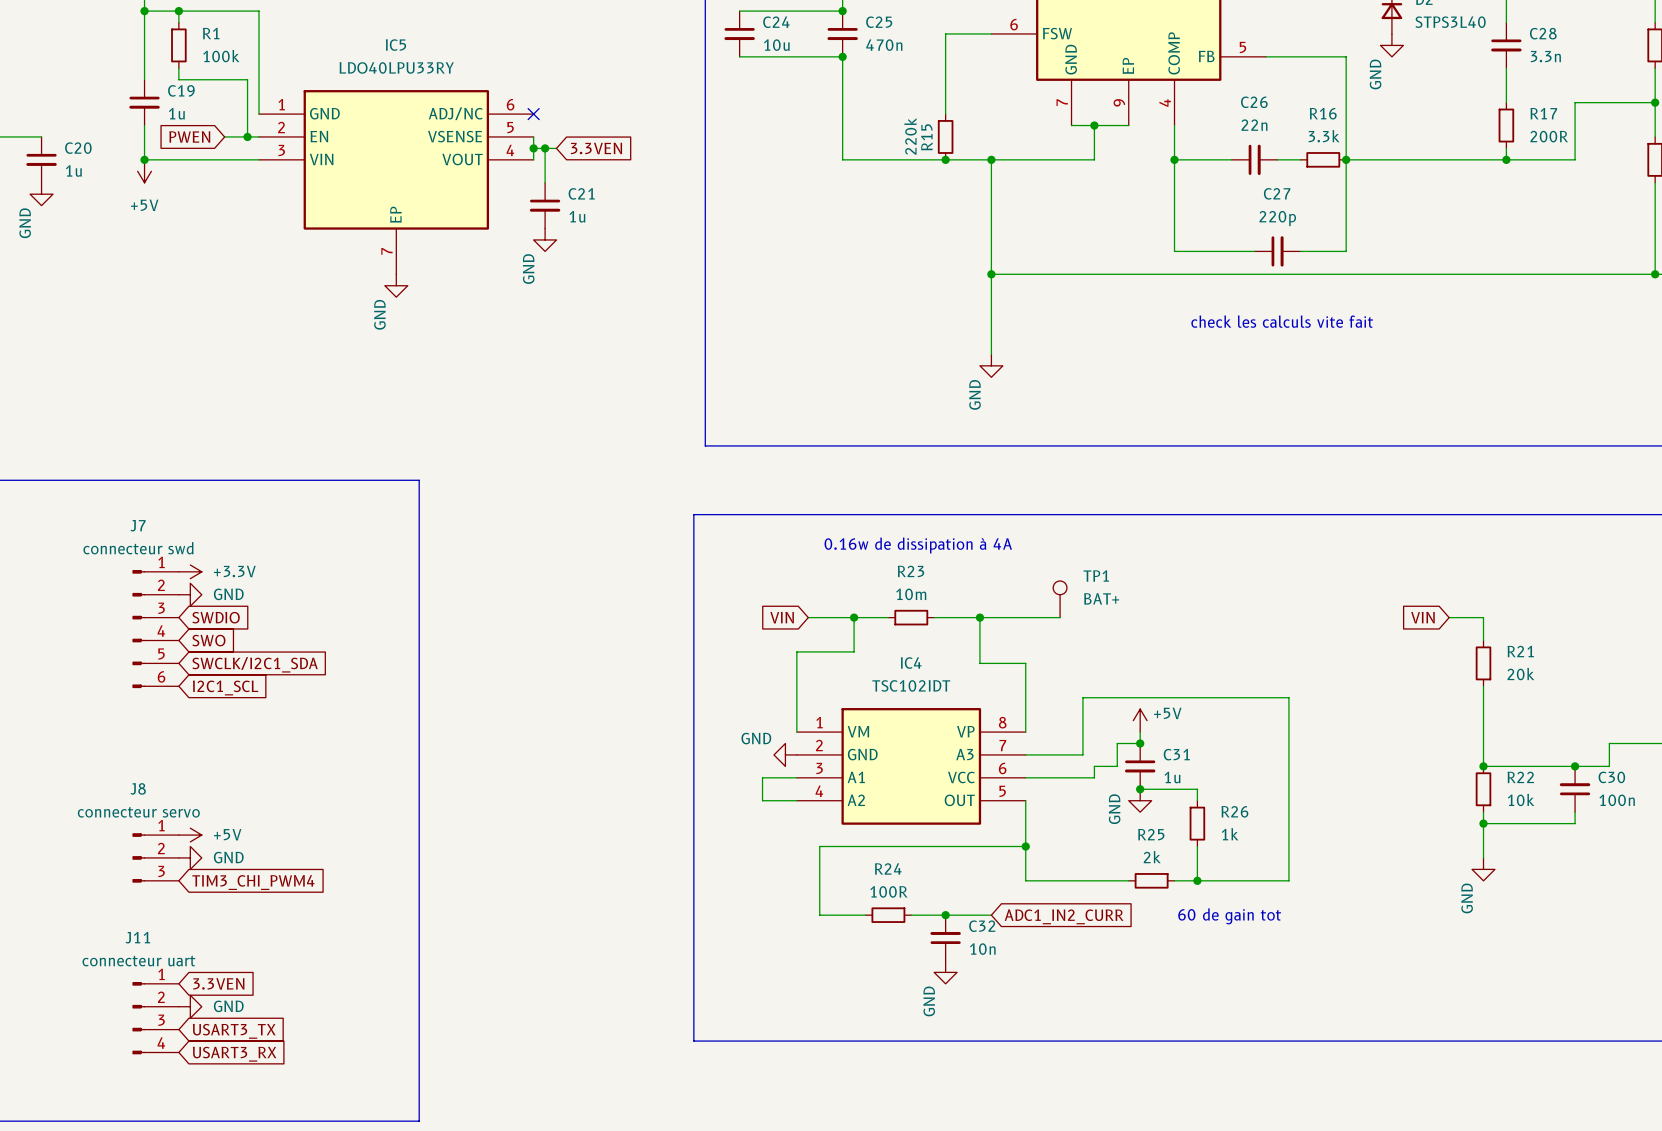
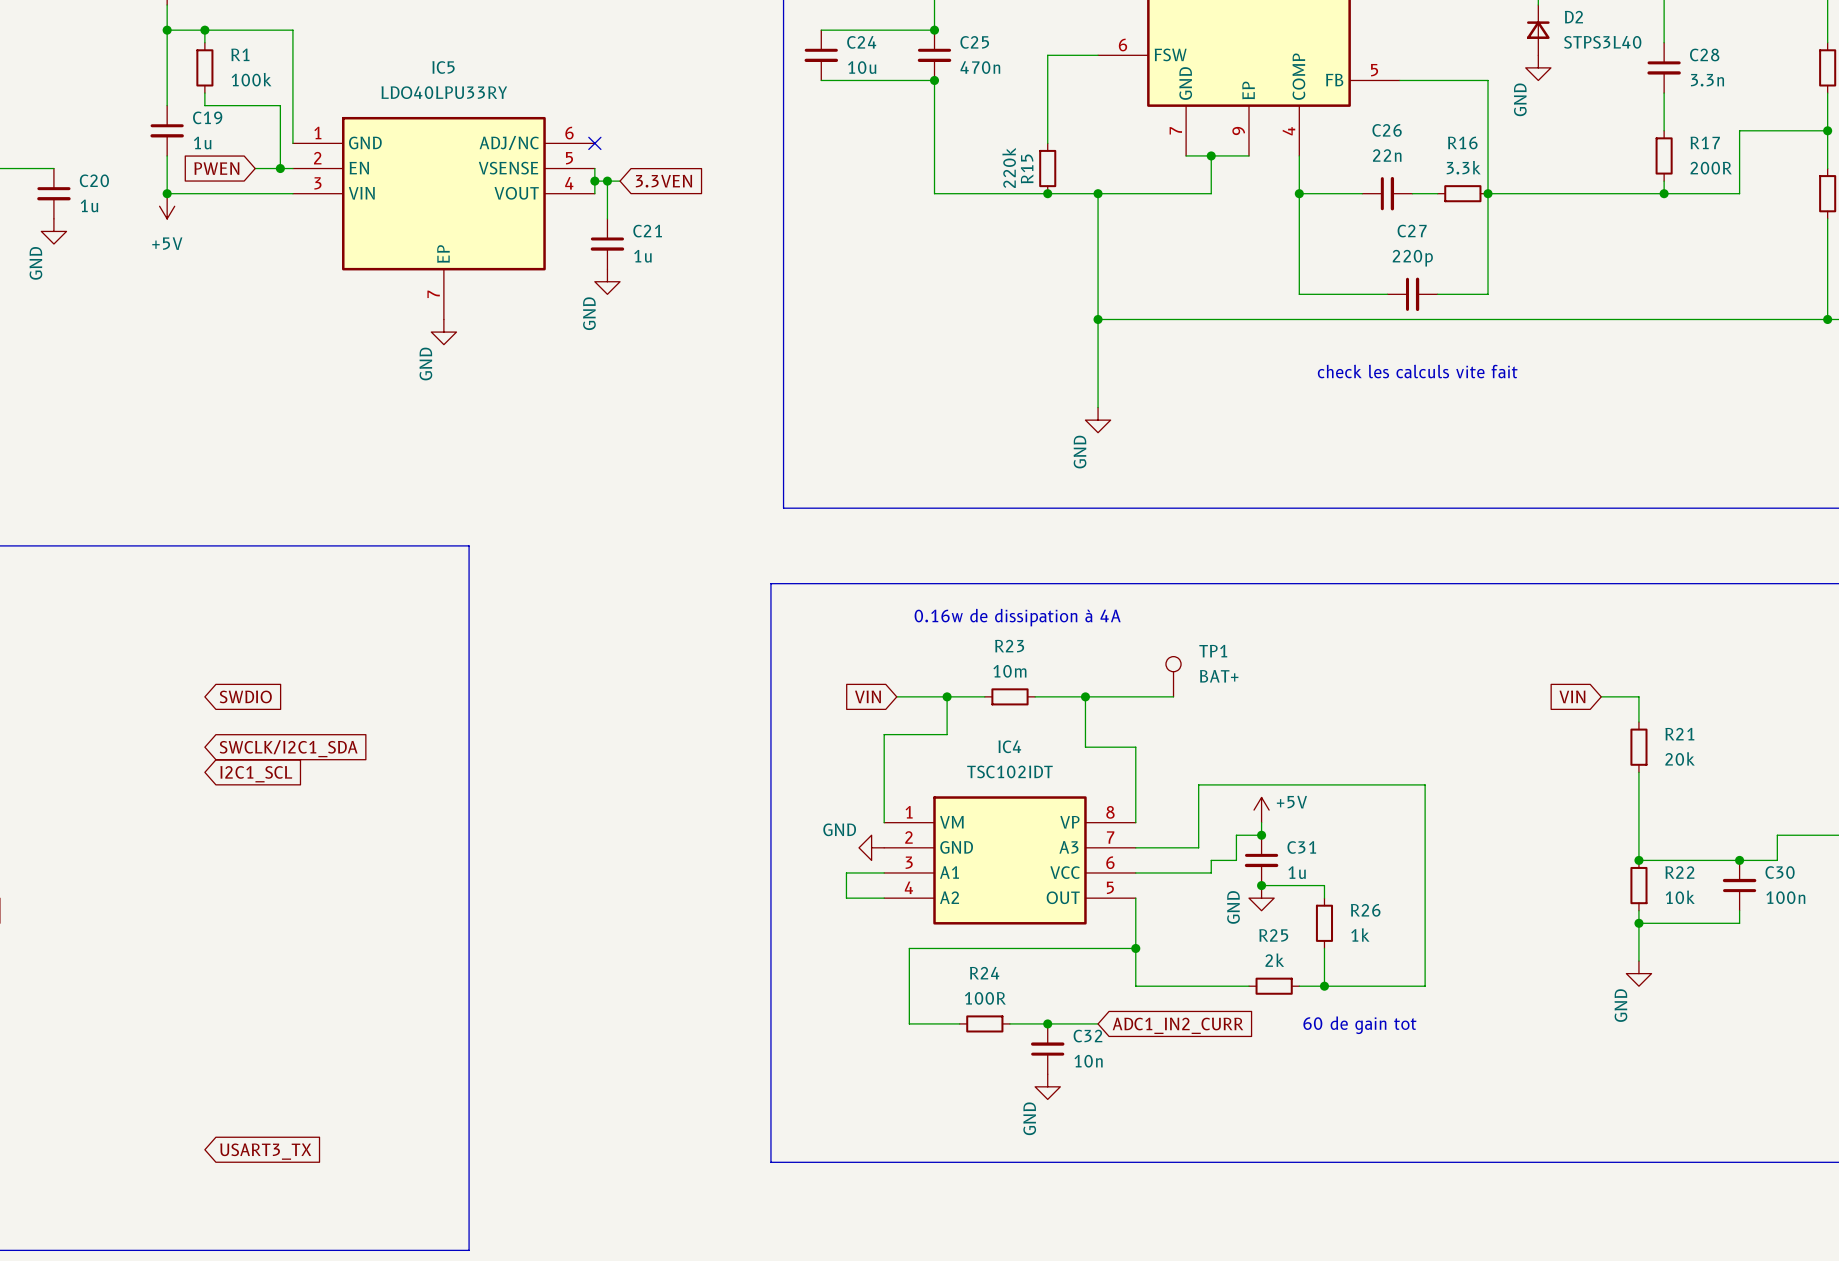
power symbol: +3.3V (190, 571) -> none
power symbol: GND (190, 594) -> none
J7: connecteur swd (155, 629) -> none
global label: SWO (208, 640) -> none
power symbol: +5V (190, 835) -> none
J8: connecteur servo (155, 857) -> none
power symbol: GND (190, 857) -> none
global label: TIM3_CHI_PWM4 (253, 882) -> none
global label: 3.3VEN (218, 983) -> none
power symbol: GND (190, 1006) -> none
J11: connecteur uart (155, 1018) -> none
global label: USART3_RX (234, 1054) -> none

